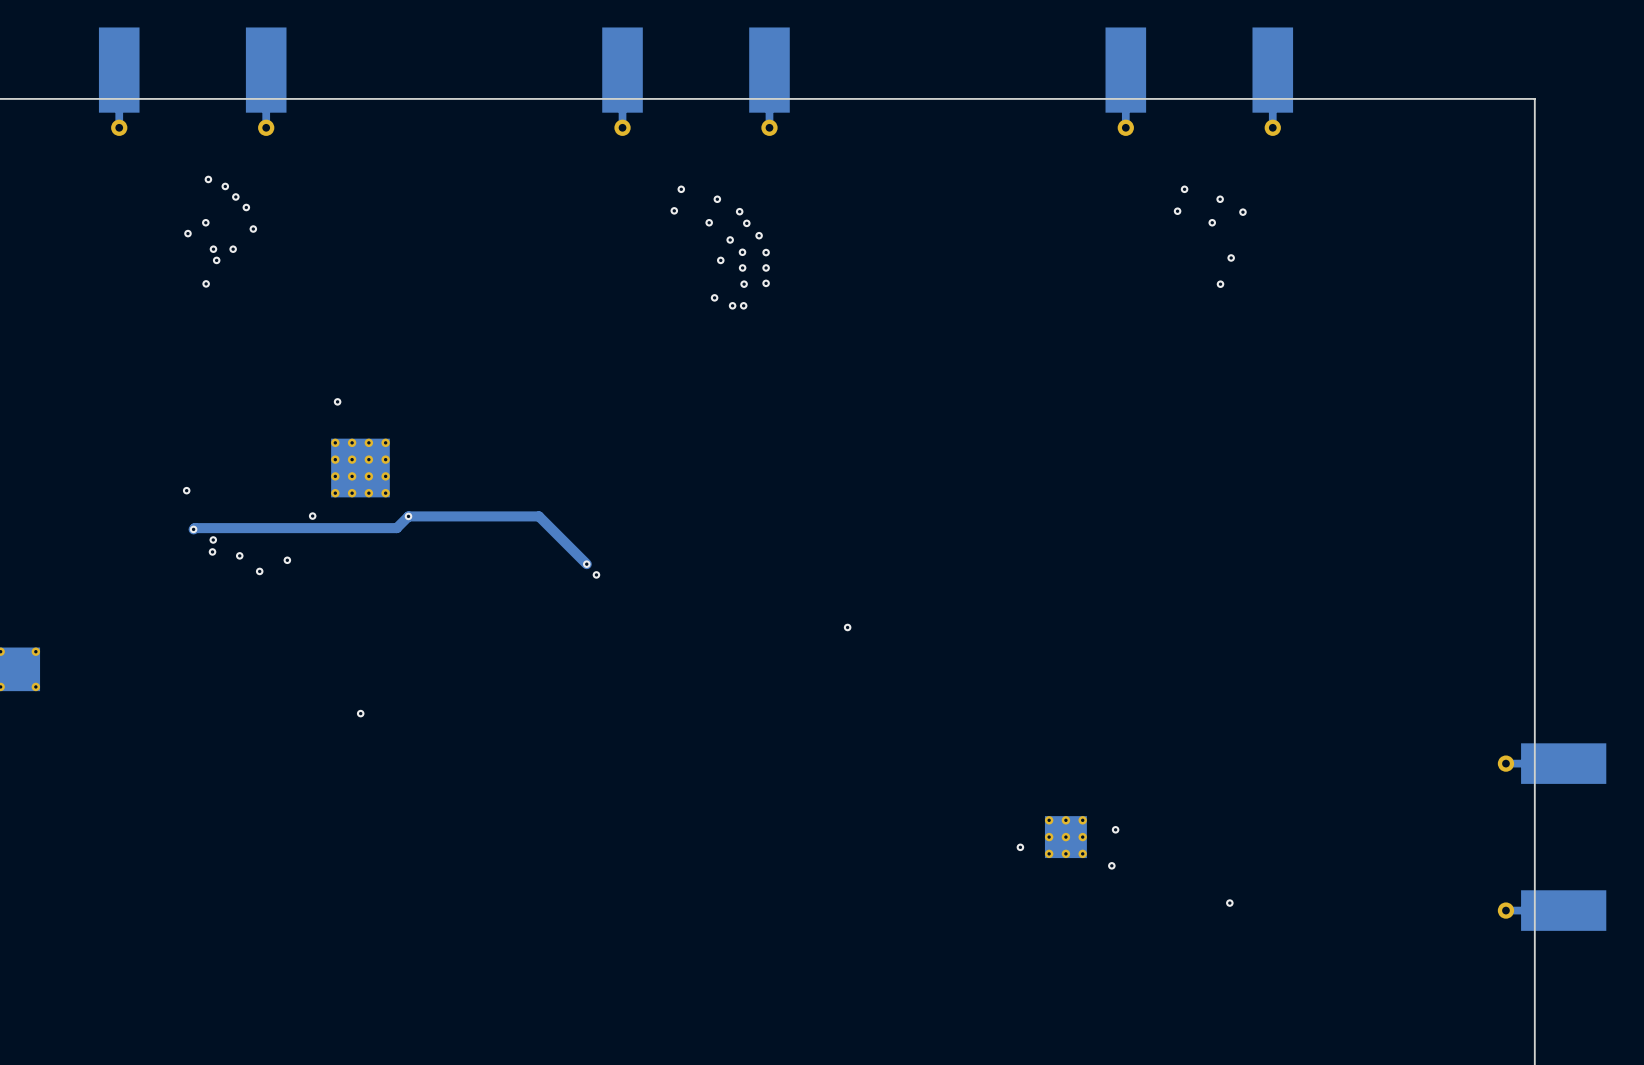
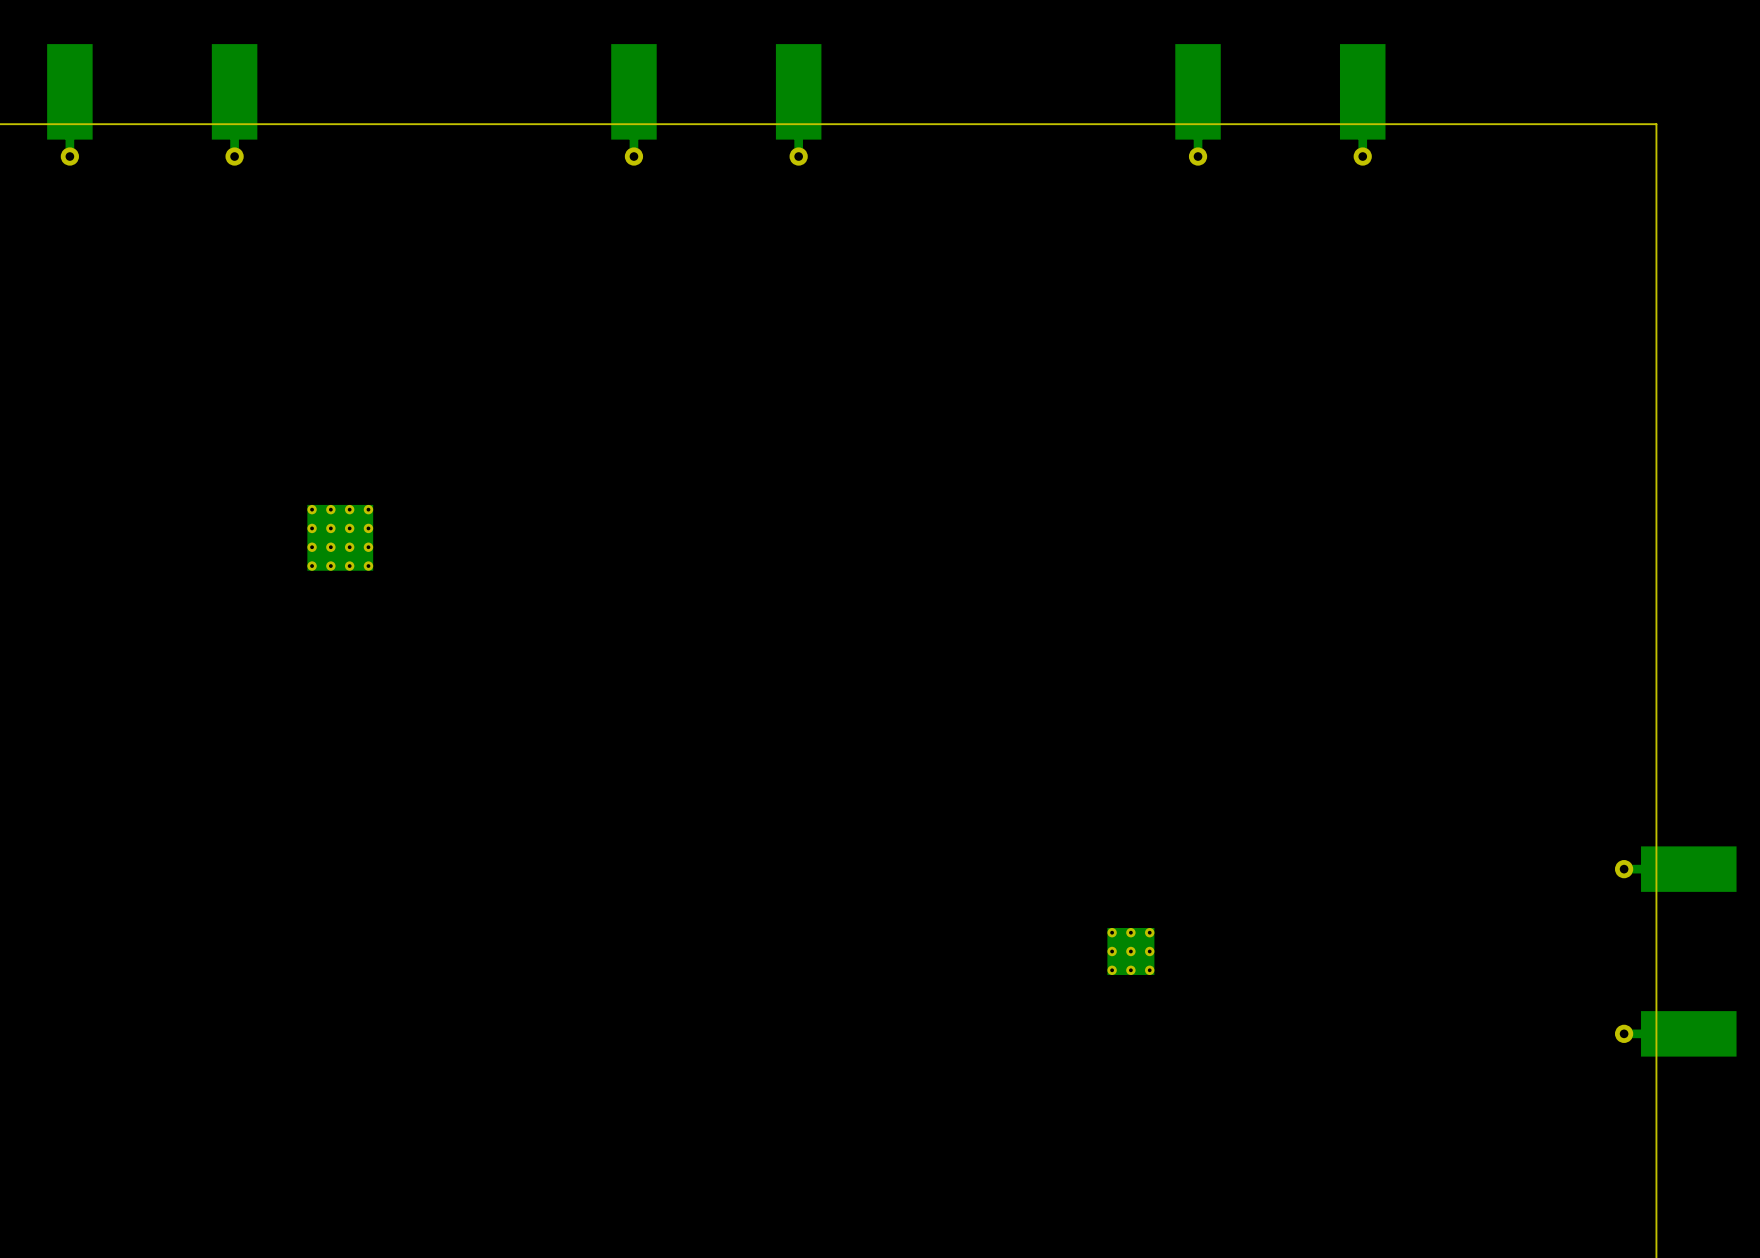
via: (208, 179) -> none
via: (225, 186) -> none
via: (681, 189) -> none
via: (1184, 189) -> none
via: (235, 196) -> none
via: (717, 199) -> none
via: (1220, 199) -> none
via: (246, 207) -> none
via: (674, 210) -> none
via: (739, 211) -> none
via: (1177, 211) -> none
via: (1242, 212) -> none
via: (205, 222) -> none
via: (709, 222) -> none
via: (1212, 222) -> none
via: (746, 223) -> none
via: (253, 229) -> none
via: (187, 233) -> none
via: (759, 235) -> none
via: (730, 239) -> none
via: (213, 249) -> none
via: (233, 249) -> none
via: (742, 252) -> none
via: (766, 252) -> none
via: (1231, 257) -> none
via: (216, 260) -> none
via: (720, 260) -> none
via: (742, 267) -> none
via: (766, 267) -> none
via: (206, 283) -> none
via: (766, 283) -> none
via: (744, 284) -> none
via: (1220, 284) -> none
via: (714, 297) -> none
via: (732, 305) -> none
via: (743, 305) -> none
via: (337, 401) -> none
via: (186, 490) -> none
via: (312, 516) -> none
via: (408, 516) -> none
track: (193, 529) (396, 528) (408, 516) (539, 516) (586, 564) -> none
via: (193, 529) -> none
via: (213, 539) -> none
via: (212, 551) -> none
via: (239, 555) -> none
via: (287, 560) -> none
via: (586, 564) -> none
via: (259, 571) -> none
via: (596, 574) -> none
via: (847, 627) -> none
via: (360, 713) -> none
via: (1115, 829) -> none
via: (1020, 847) -> none
via: (1111, 865) -> none
via: (1229, 903) -> none

